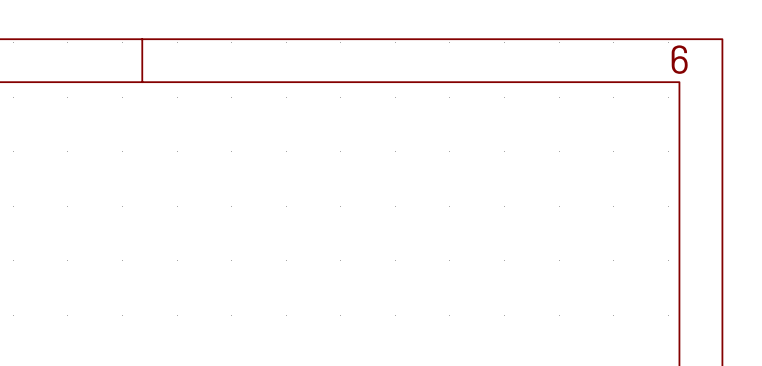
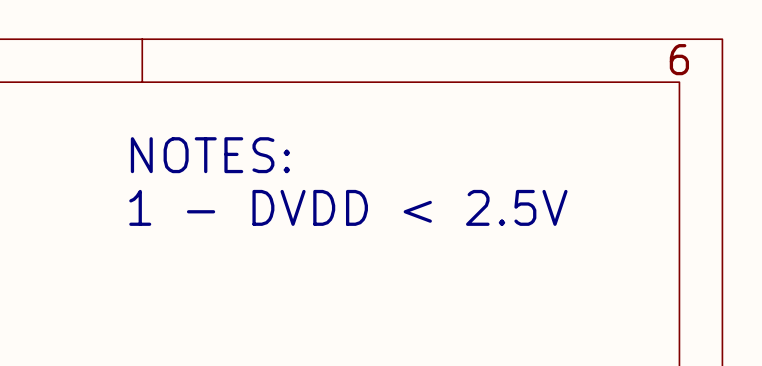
text: none -> NOTES: (210, 155)
text: none -> 1 - DVDD < 2.5V (348, 207)

